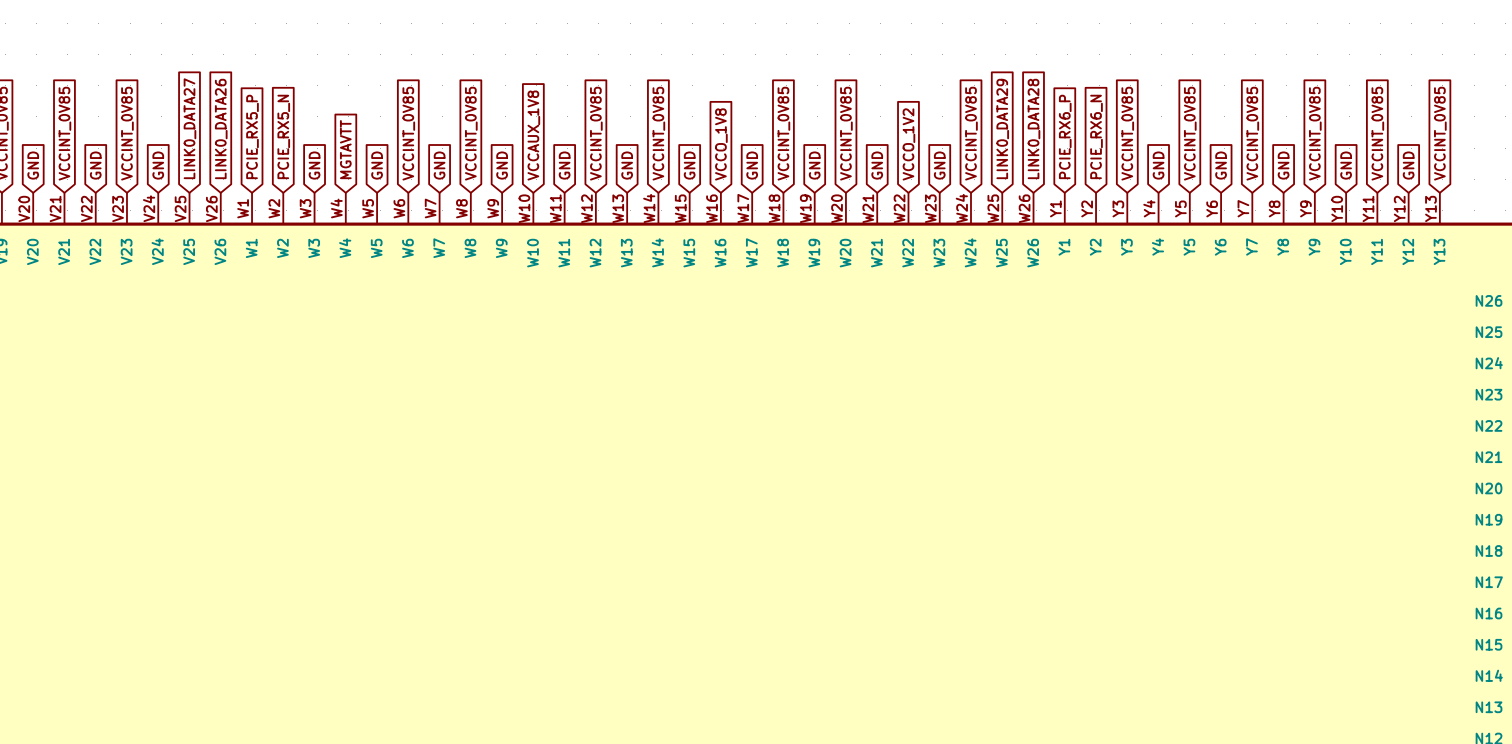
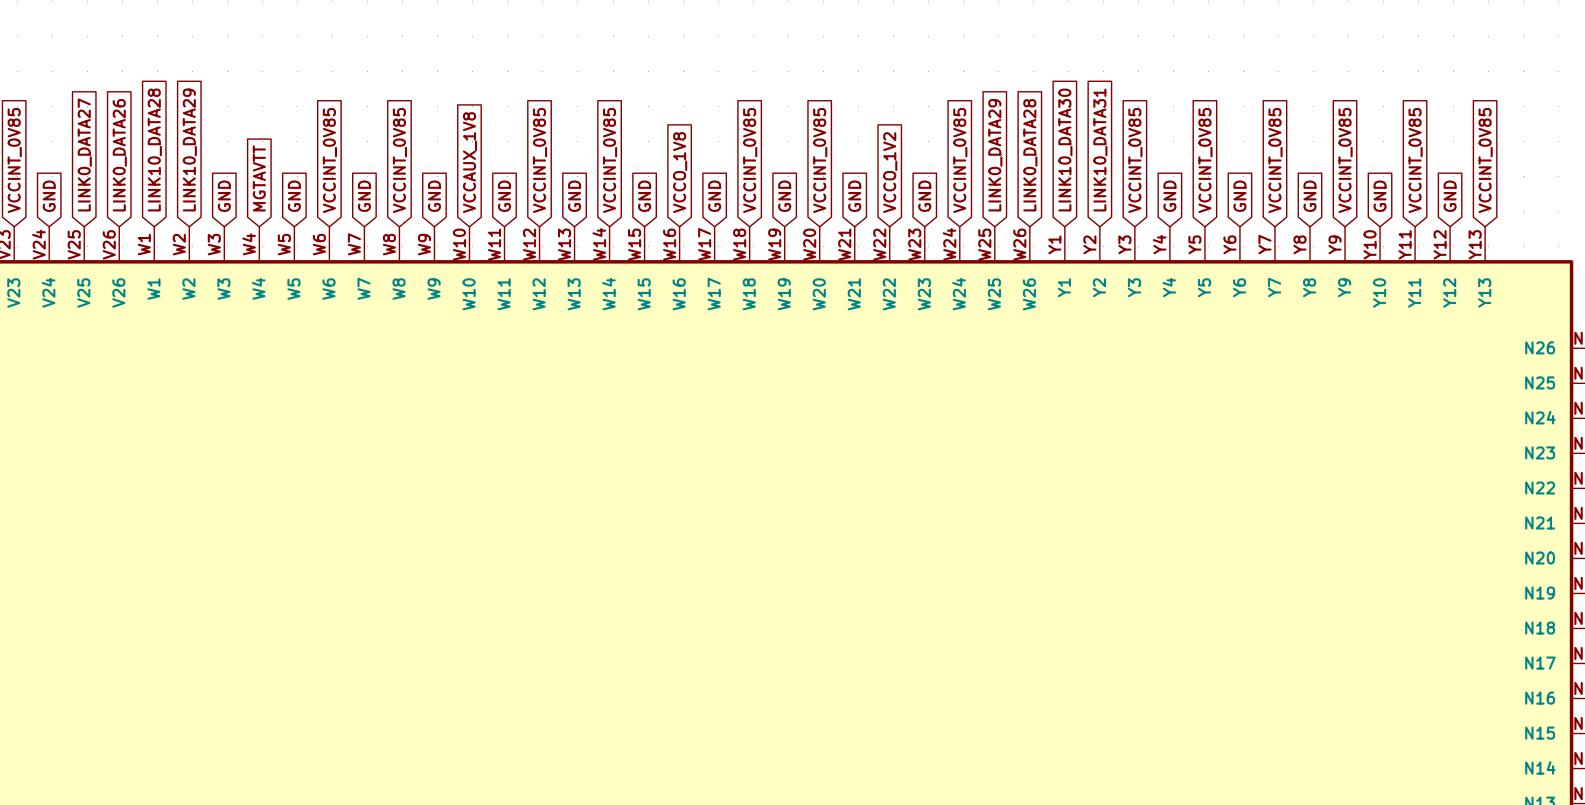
global label: PCIE_RX5_P (252, 136) -> LINK10_DATA28 (154, 149)
global label: PCIE_RX5_N (283, 136) -> LINK10_DATA29 (189, 149)
global label: PCIE_RX6_P (1065, 136) -> LINK10_DATA30 (1065, 149)
global label: PCIE_RX6_N (1096, 136) -> LINK10_DATA31 (1100, 149)

